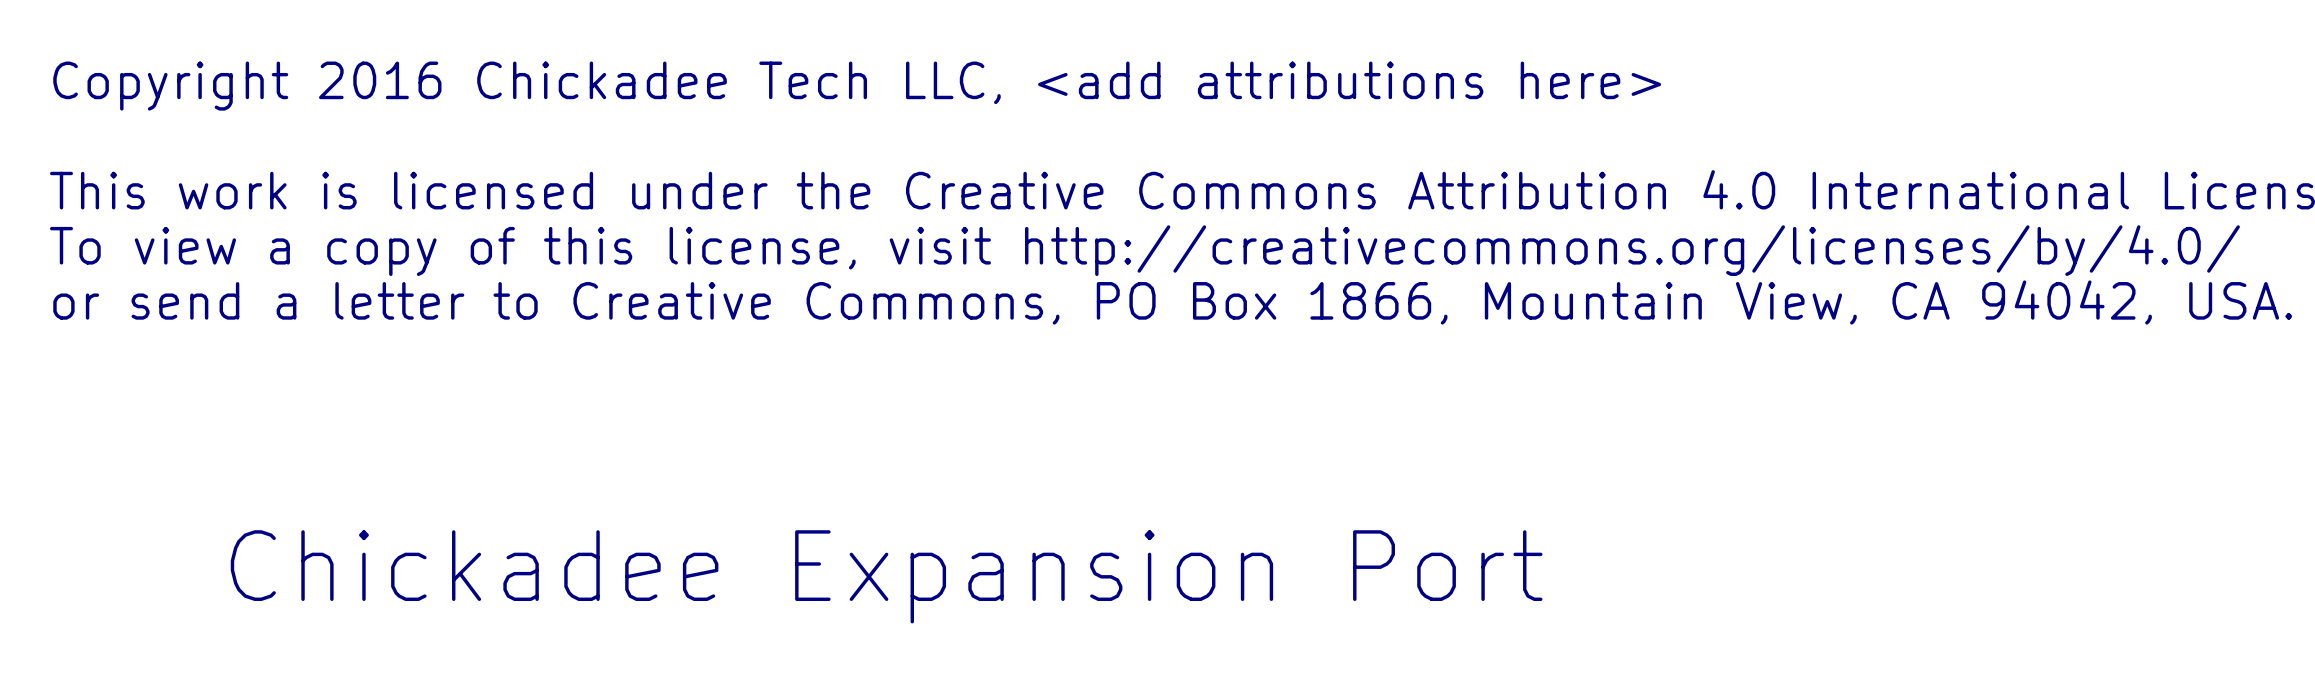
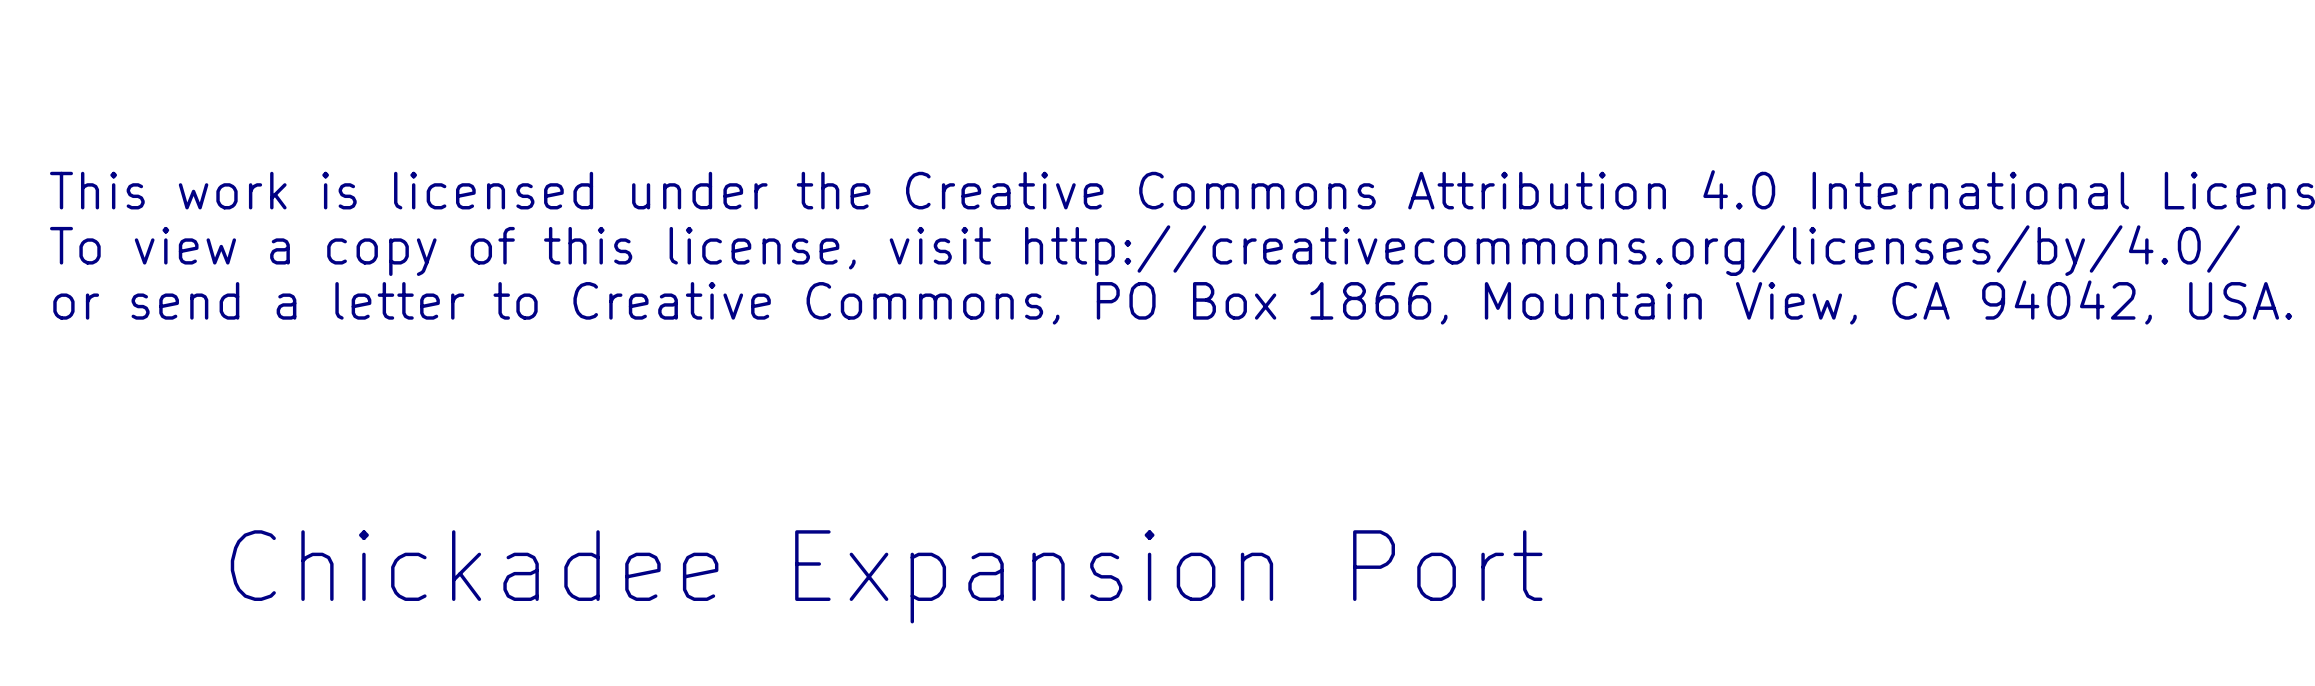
text: Copyright 2016 Chickadee Tech LLC, <add attributions here> (857, 86) -> none

